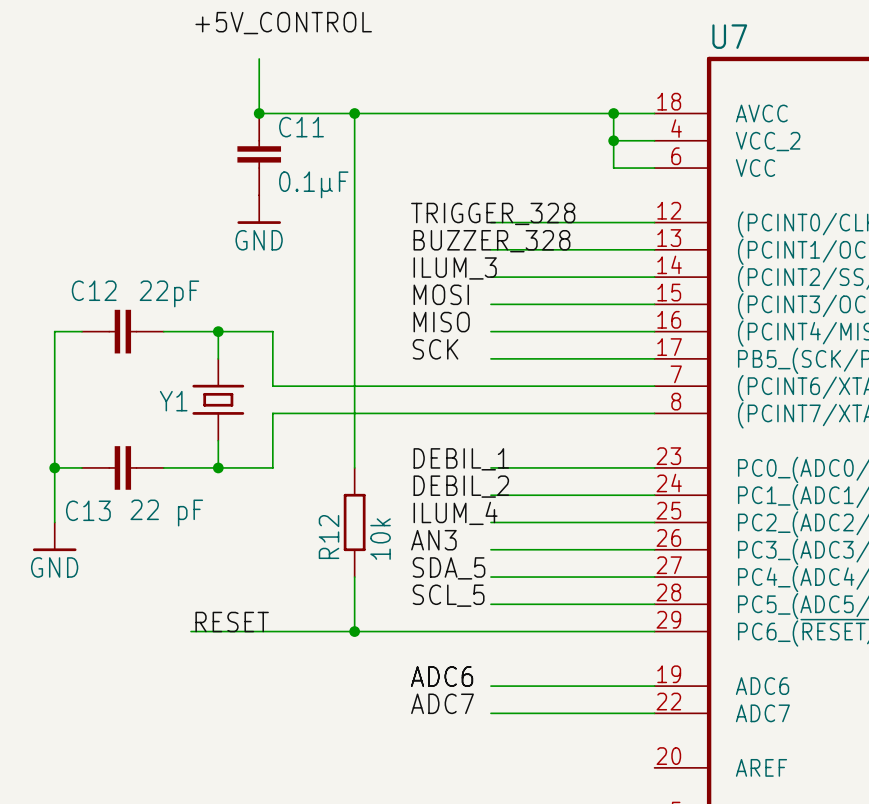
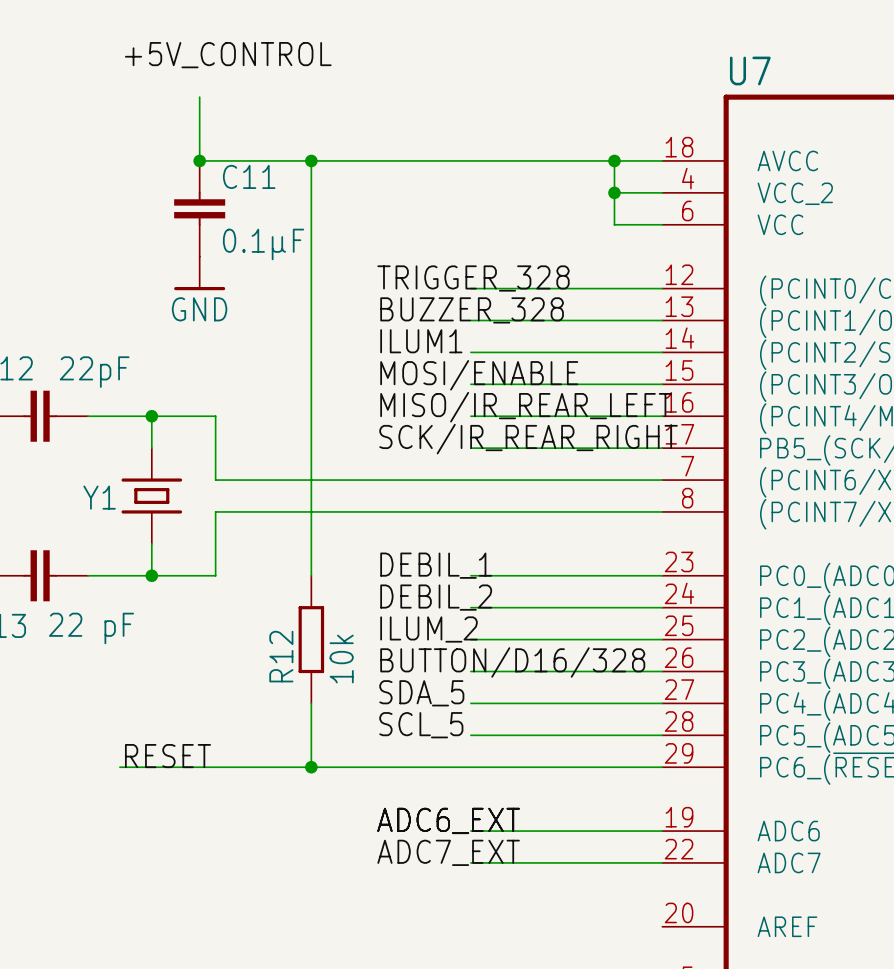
label: ILUM_3 (455, 268) -> ILUM1 (421, 341)
label: MOSI (441, 294) -> MOSI/ENABLE (479, 375)
label: MISO (441, 322) -> MISO/IR_REAR_LEFT (526, 407)
label: SCK (435, 349) -> SCK/IR_REAR_RIGHT (528, 439)
label: ILUM_4 (455, 513) -> ILUM_2 (428, 629)
label: AN3 (433, 540) -> BUTTON/D16/328 (512, 662)
label: ADC6 (442, 676) -> ADC6_EXT (448, 820)
label: ADC7 (442, 703) -> ADC7_EXT (448, 852)

